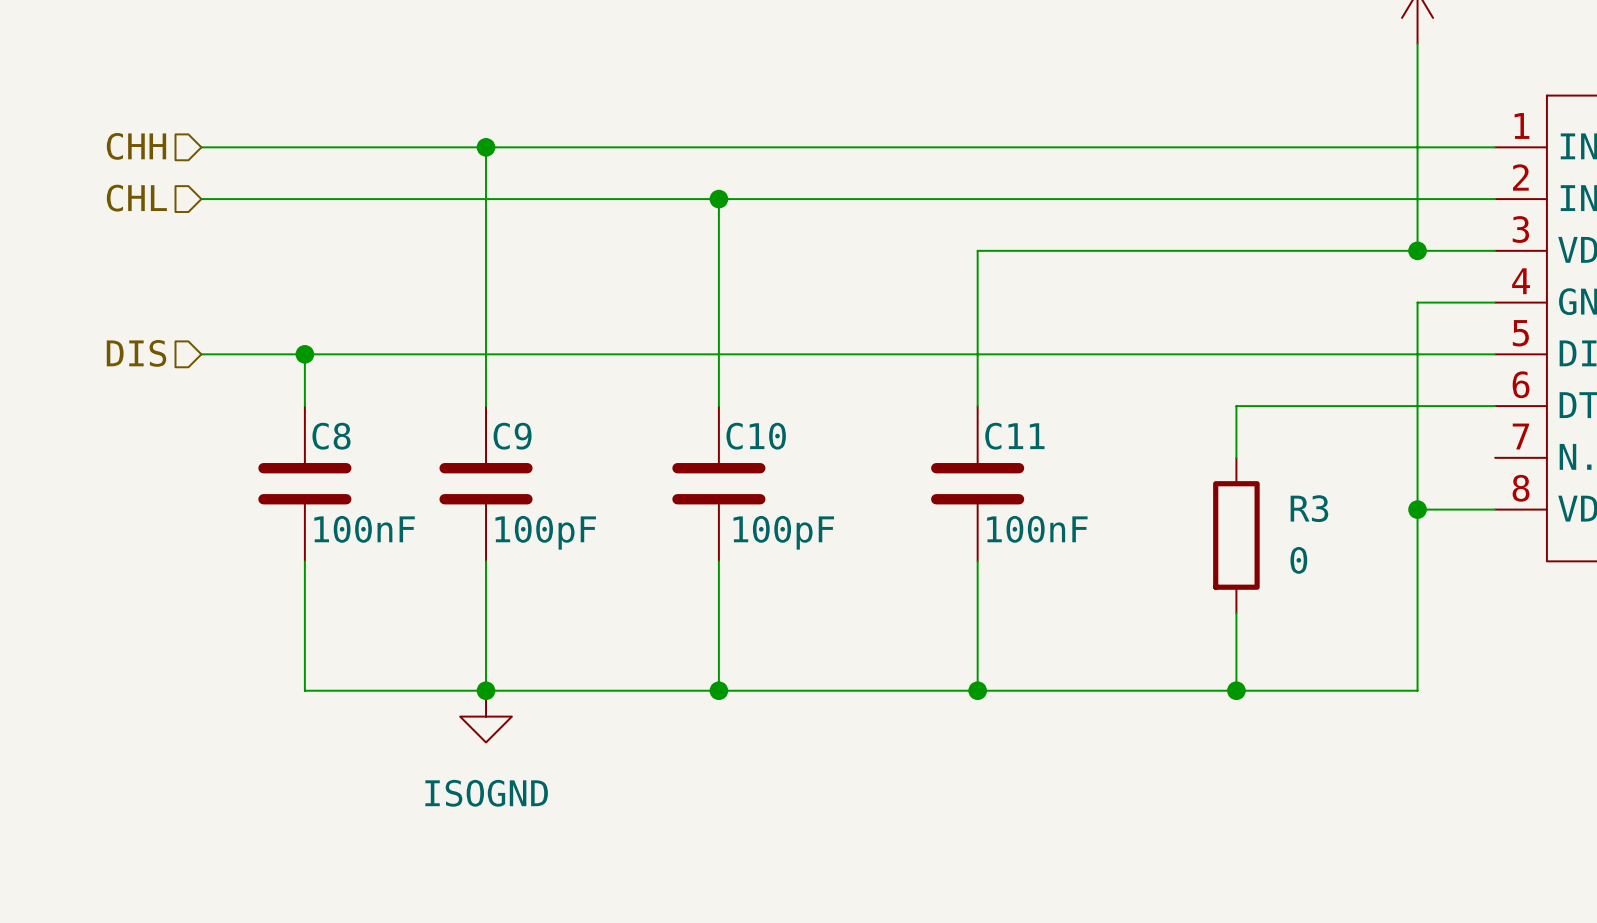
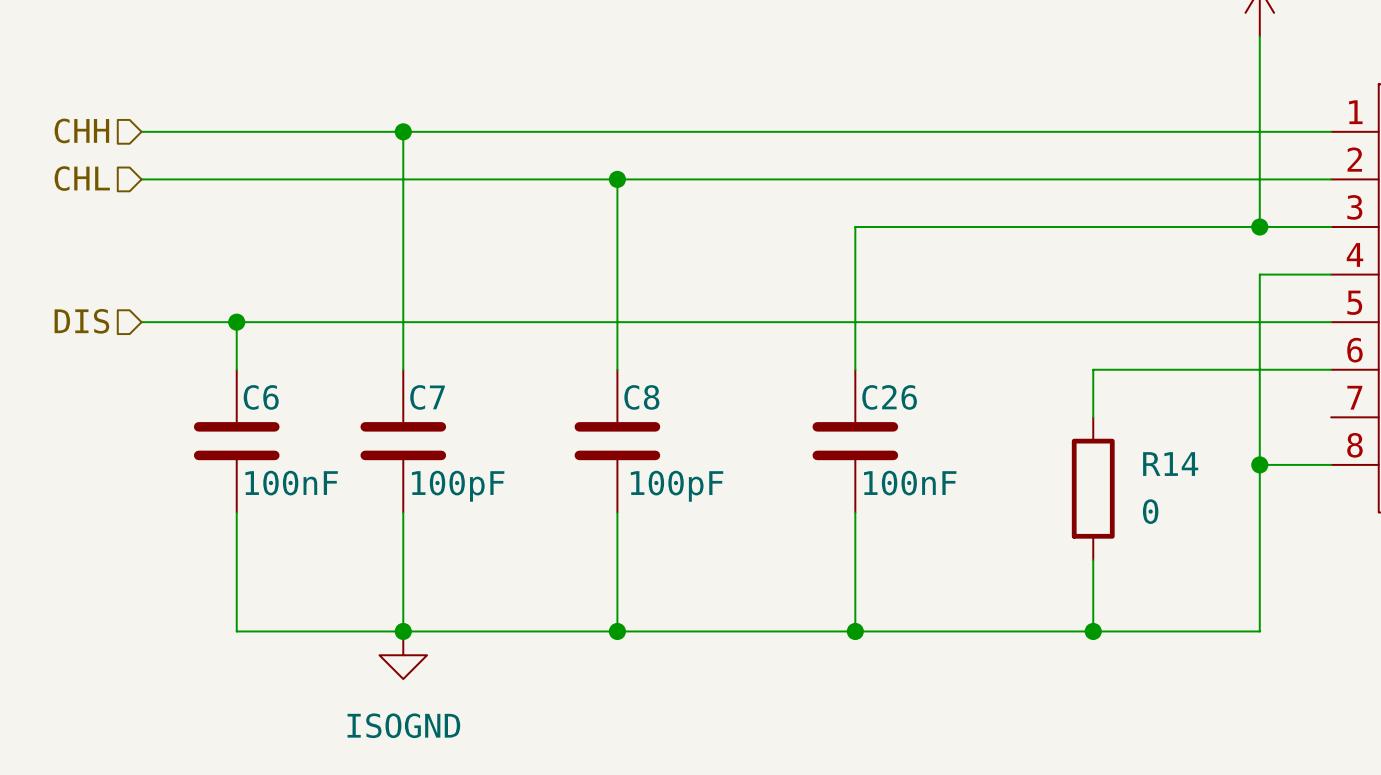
C8 name: C8 (331, 436) -> C6 (261, 397)
C9 name: C9 (512, 436) -> C7 (427, 397)
C10 name: C10 (756, 436) -> C8 (641, 397)
C11 name: C11 (1014, 436) -> C26 (889, 397)
R3 name: R3 (1309, 508) -> R14 (1170, 464)

